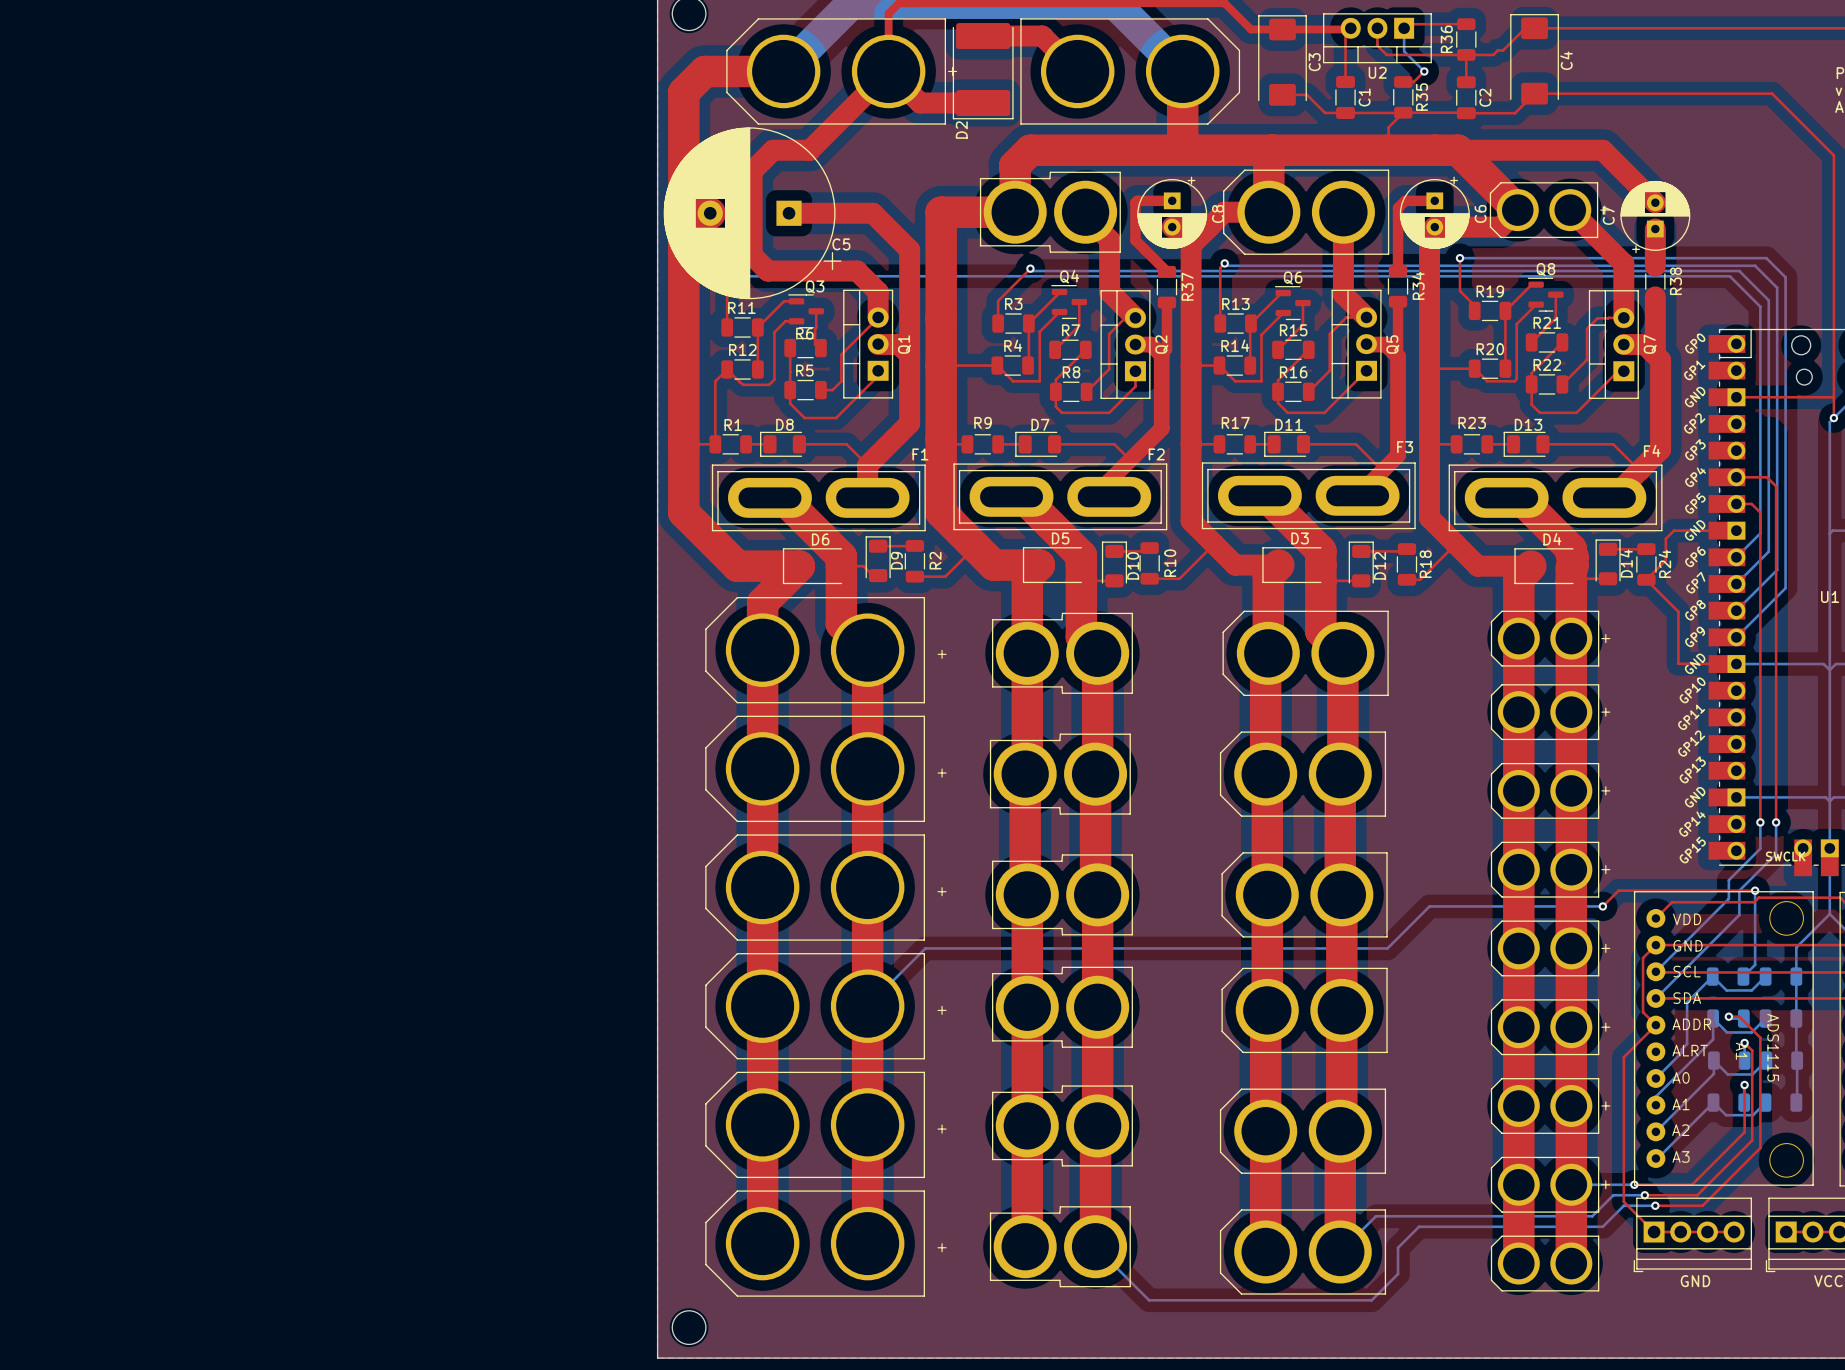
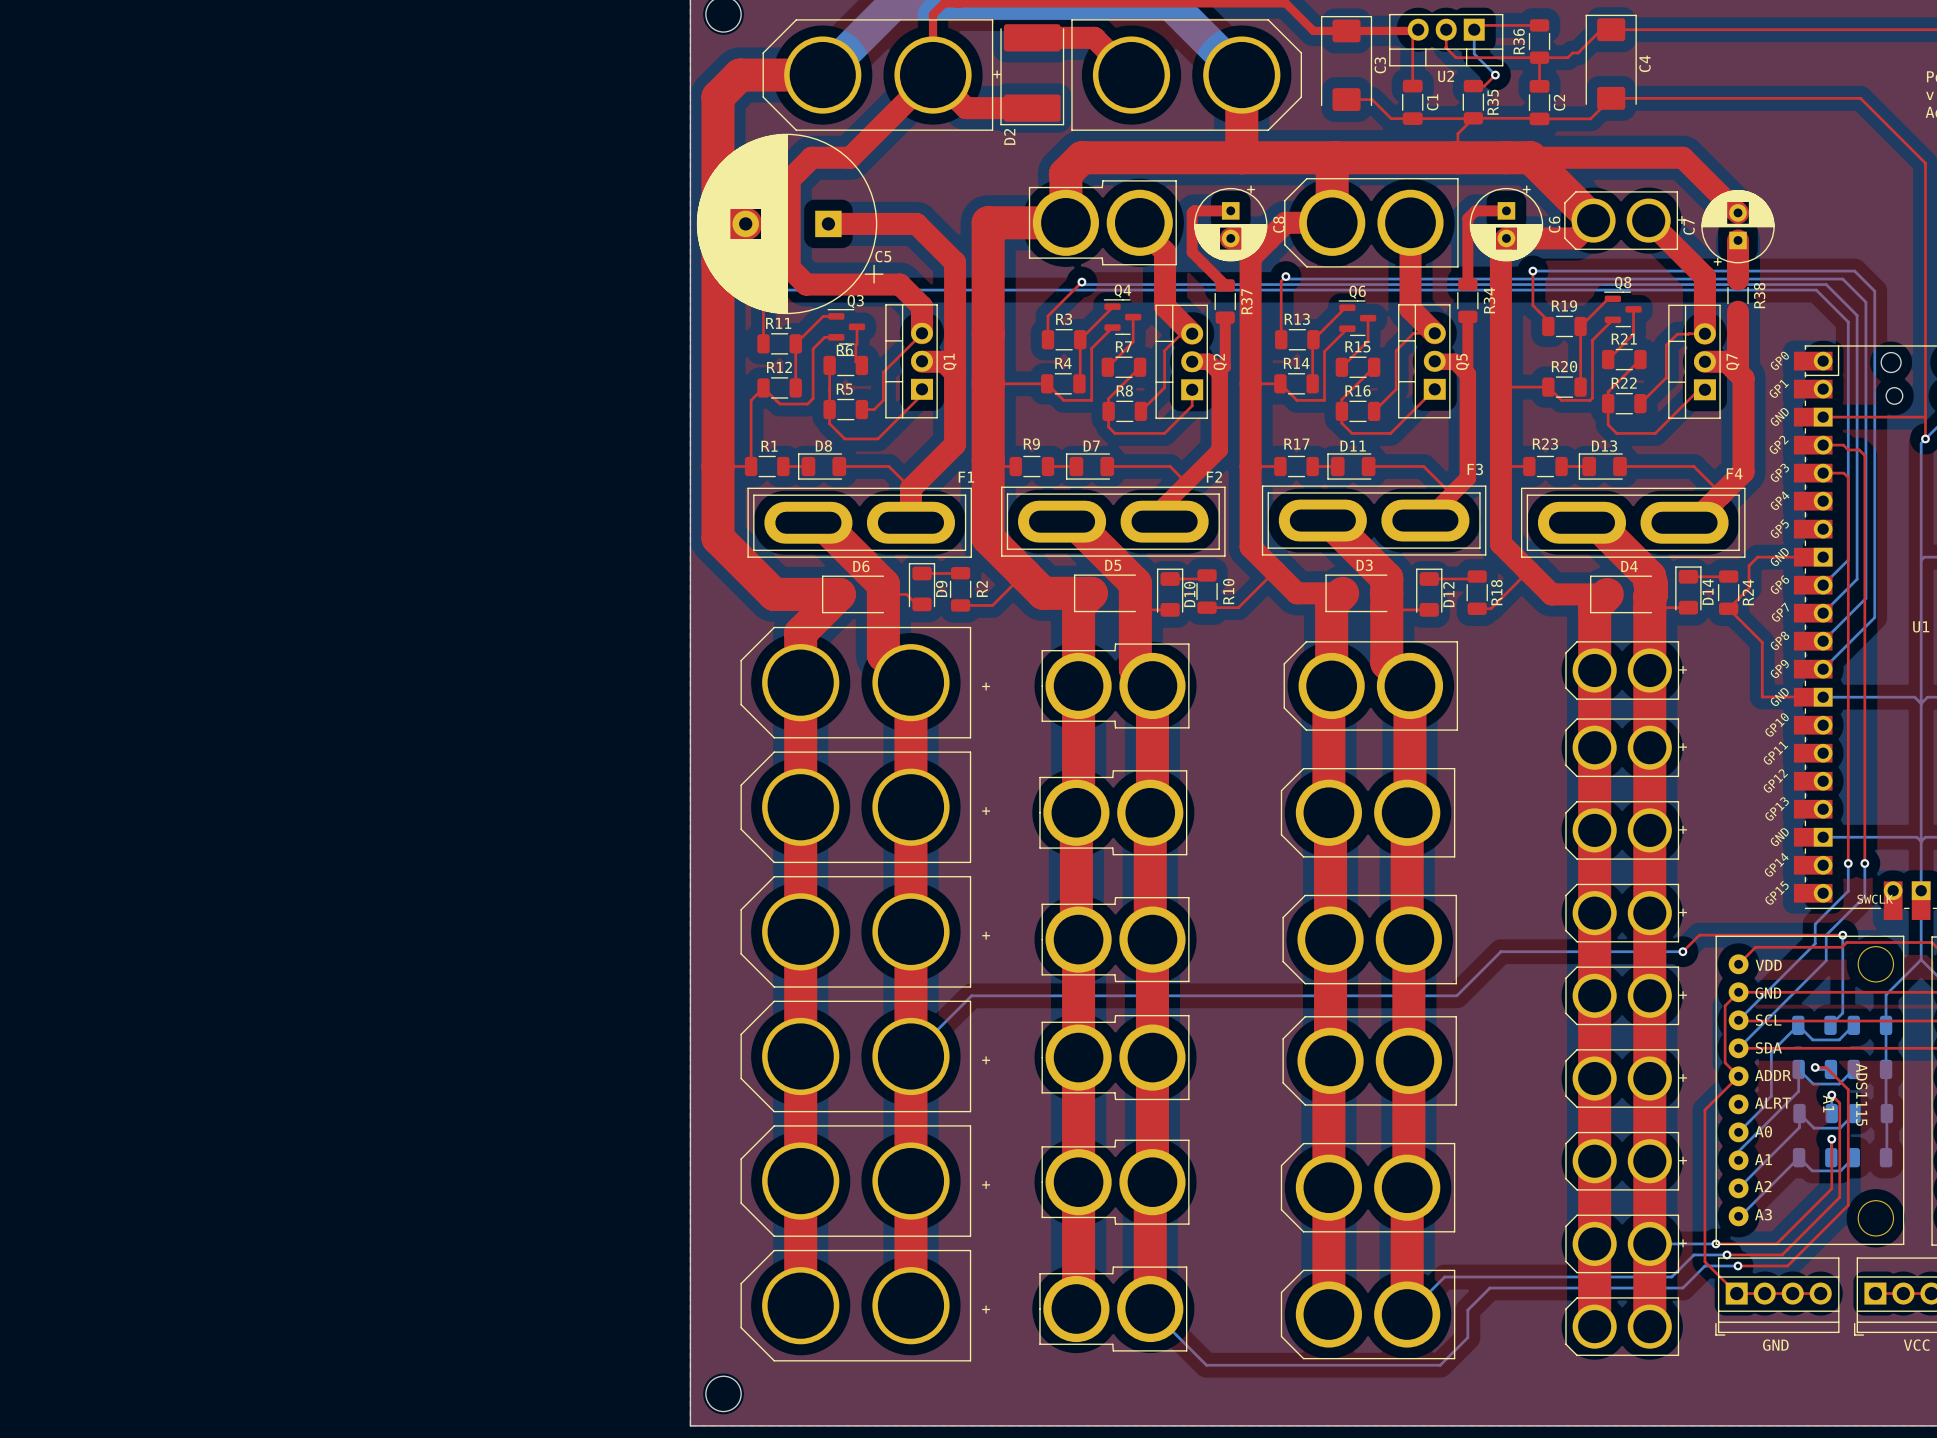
top track: (1736, 477) (1767, 477) (1776, 486) -> (1823, 445) (1843, 445) (1848, 449) (1859, 449) (1864, 455) (1864, 510)
top track: (1736, 503) (1751, 503) (1760, 512) -> (1823, 473) (1843, 473) (1848, 477) (1848, 538)

